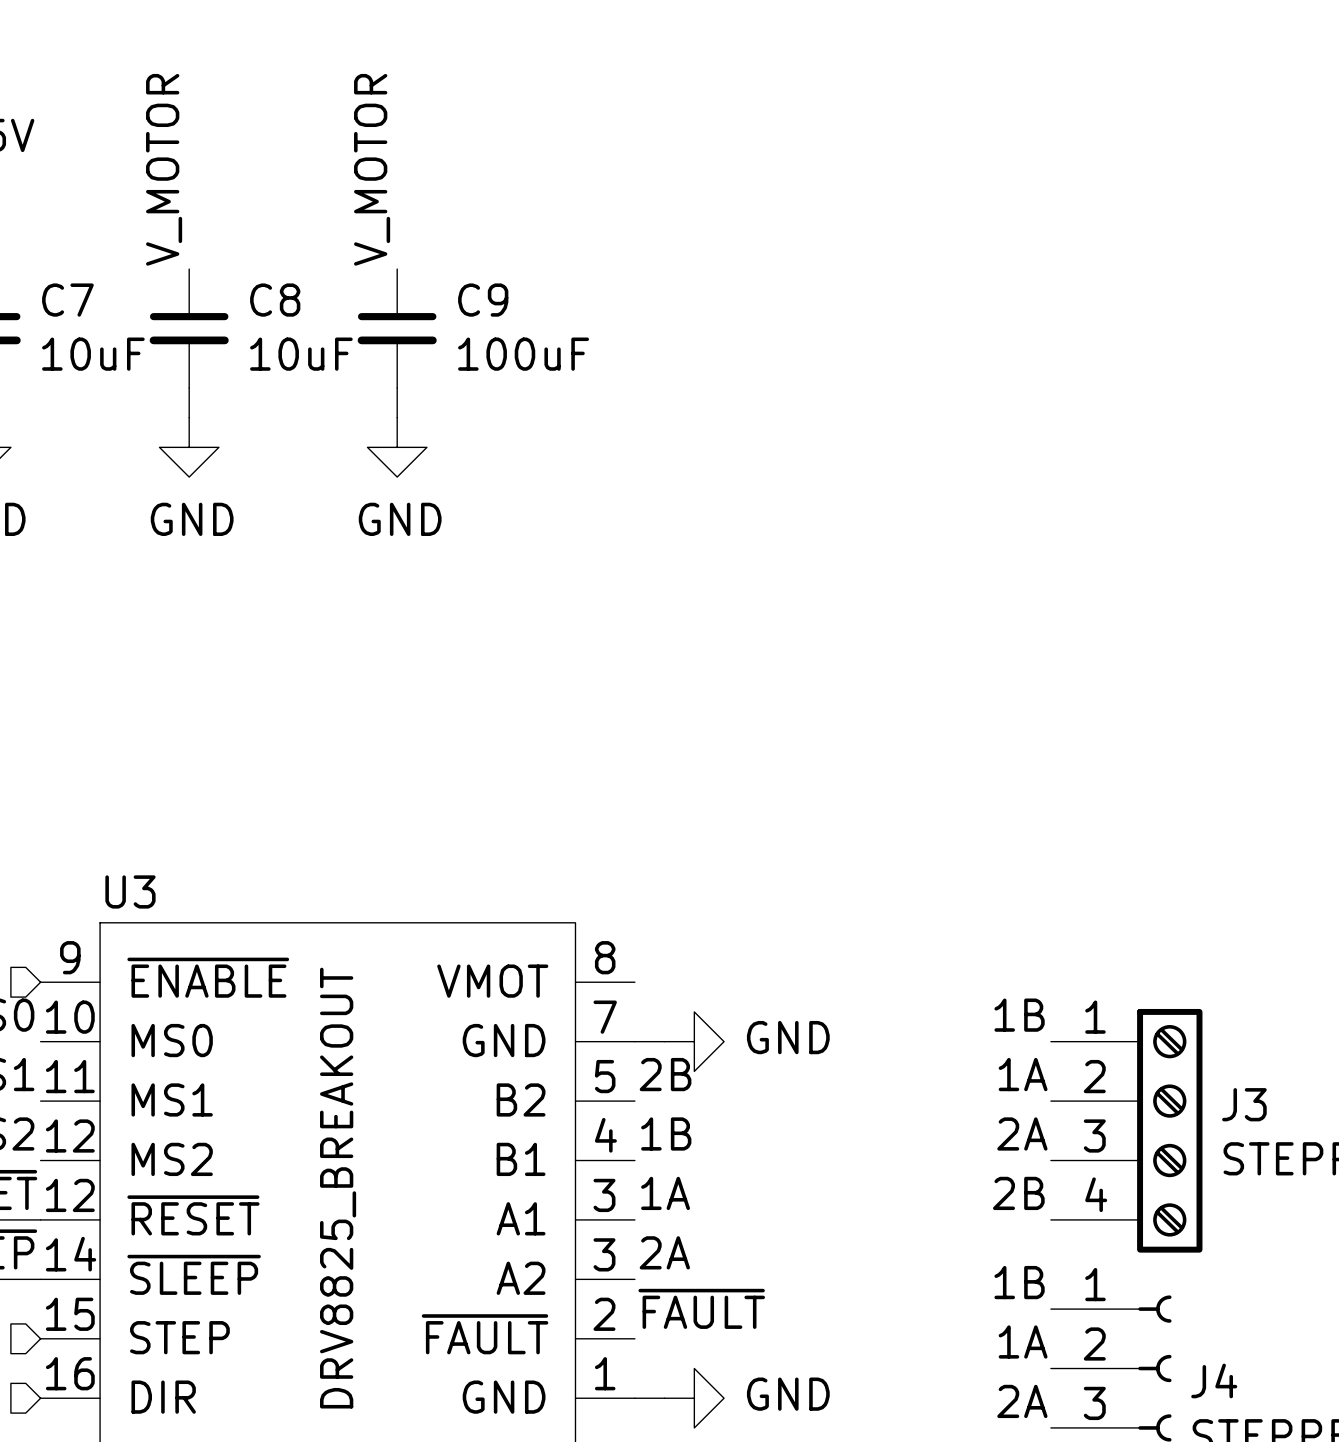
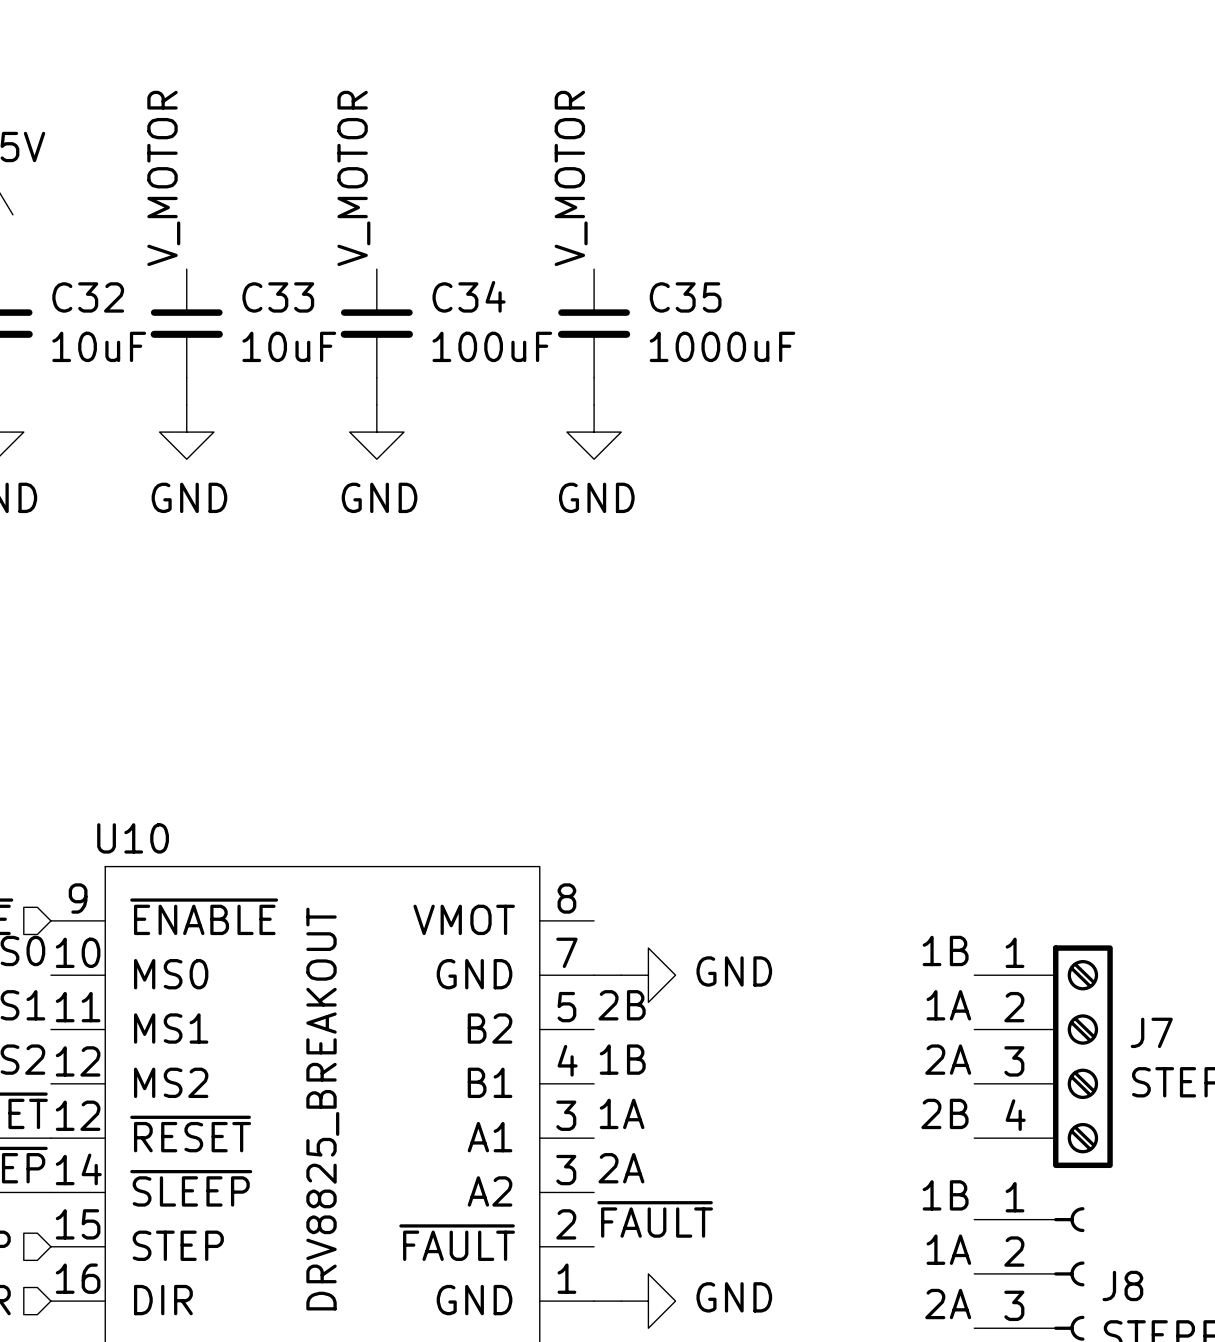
label: none -> V_MOTOR (571, 178)
C7 name: C7 (67, 300) -> C32 (88, 297)
C8 name: C8 (275, 300) -> C33 (278, 297)
C9 name: C9 (483, 300) -> C34 (469, 296)
C35: none -> 1000uF (594, 323)
wire: none -> (594, 377) (594, 404)
power symbol: none -> GND (594, 432)
U3 name: U3 (130, 891) -> U10 (133, 838)
J3 name: J3 (1244, 1104) -> J7 (1151, 1032)
J4 name: J4 (1214, 1380) -> J8 (1122, 1285)

